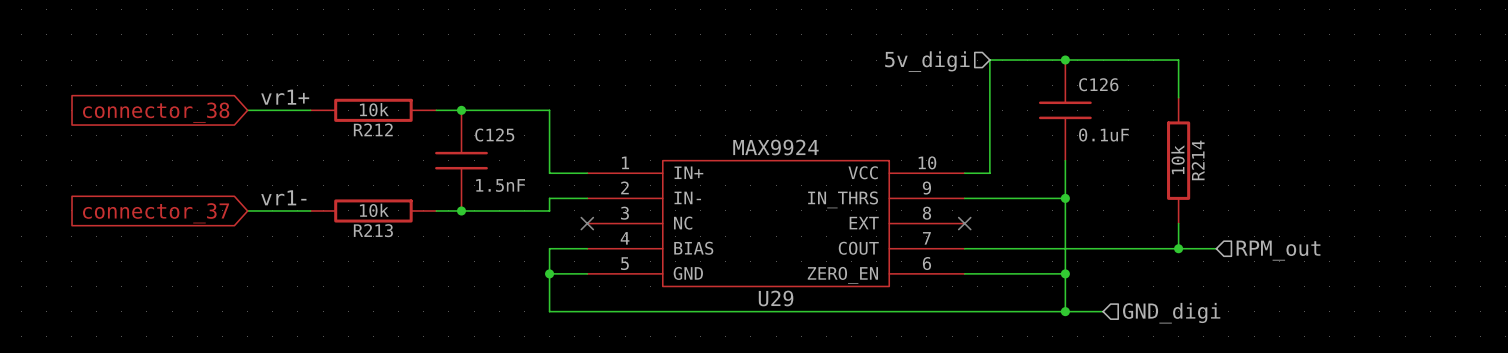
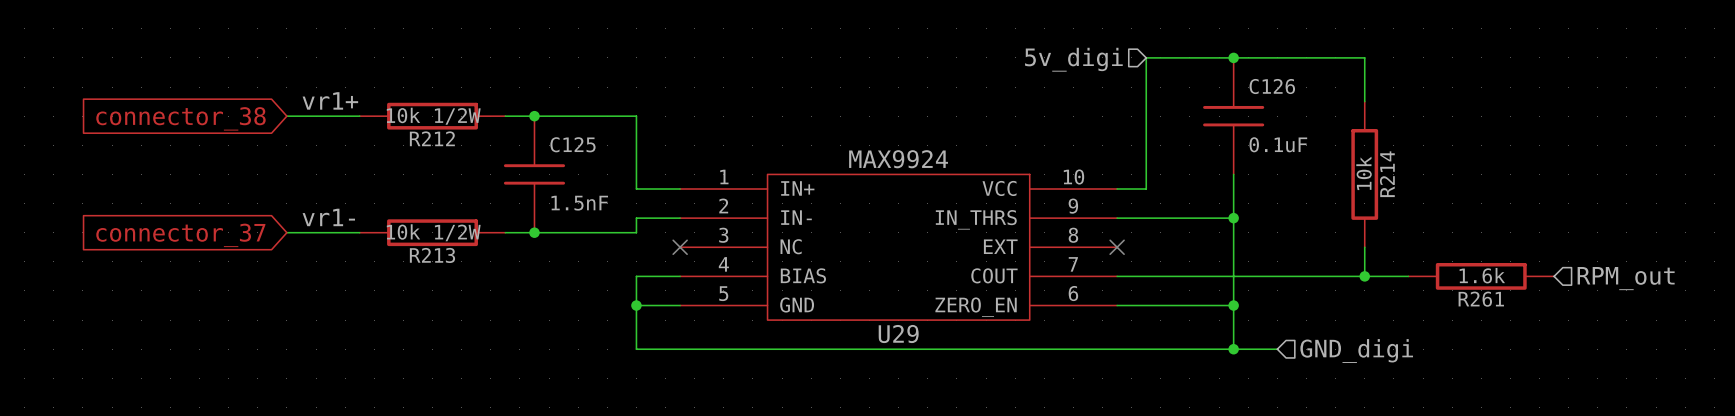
R212 value: 10k (374, 109) -> 10k 1/2W (433, 116)
R213 value: 10k (374, 210) -> 10k 1/2W (433, 232)
R261: none -> 1.6k (1481, 276)
hierarchical label position: RPM_out (1278, 250) -> RPM_out (1626, 278)

